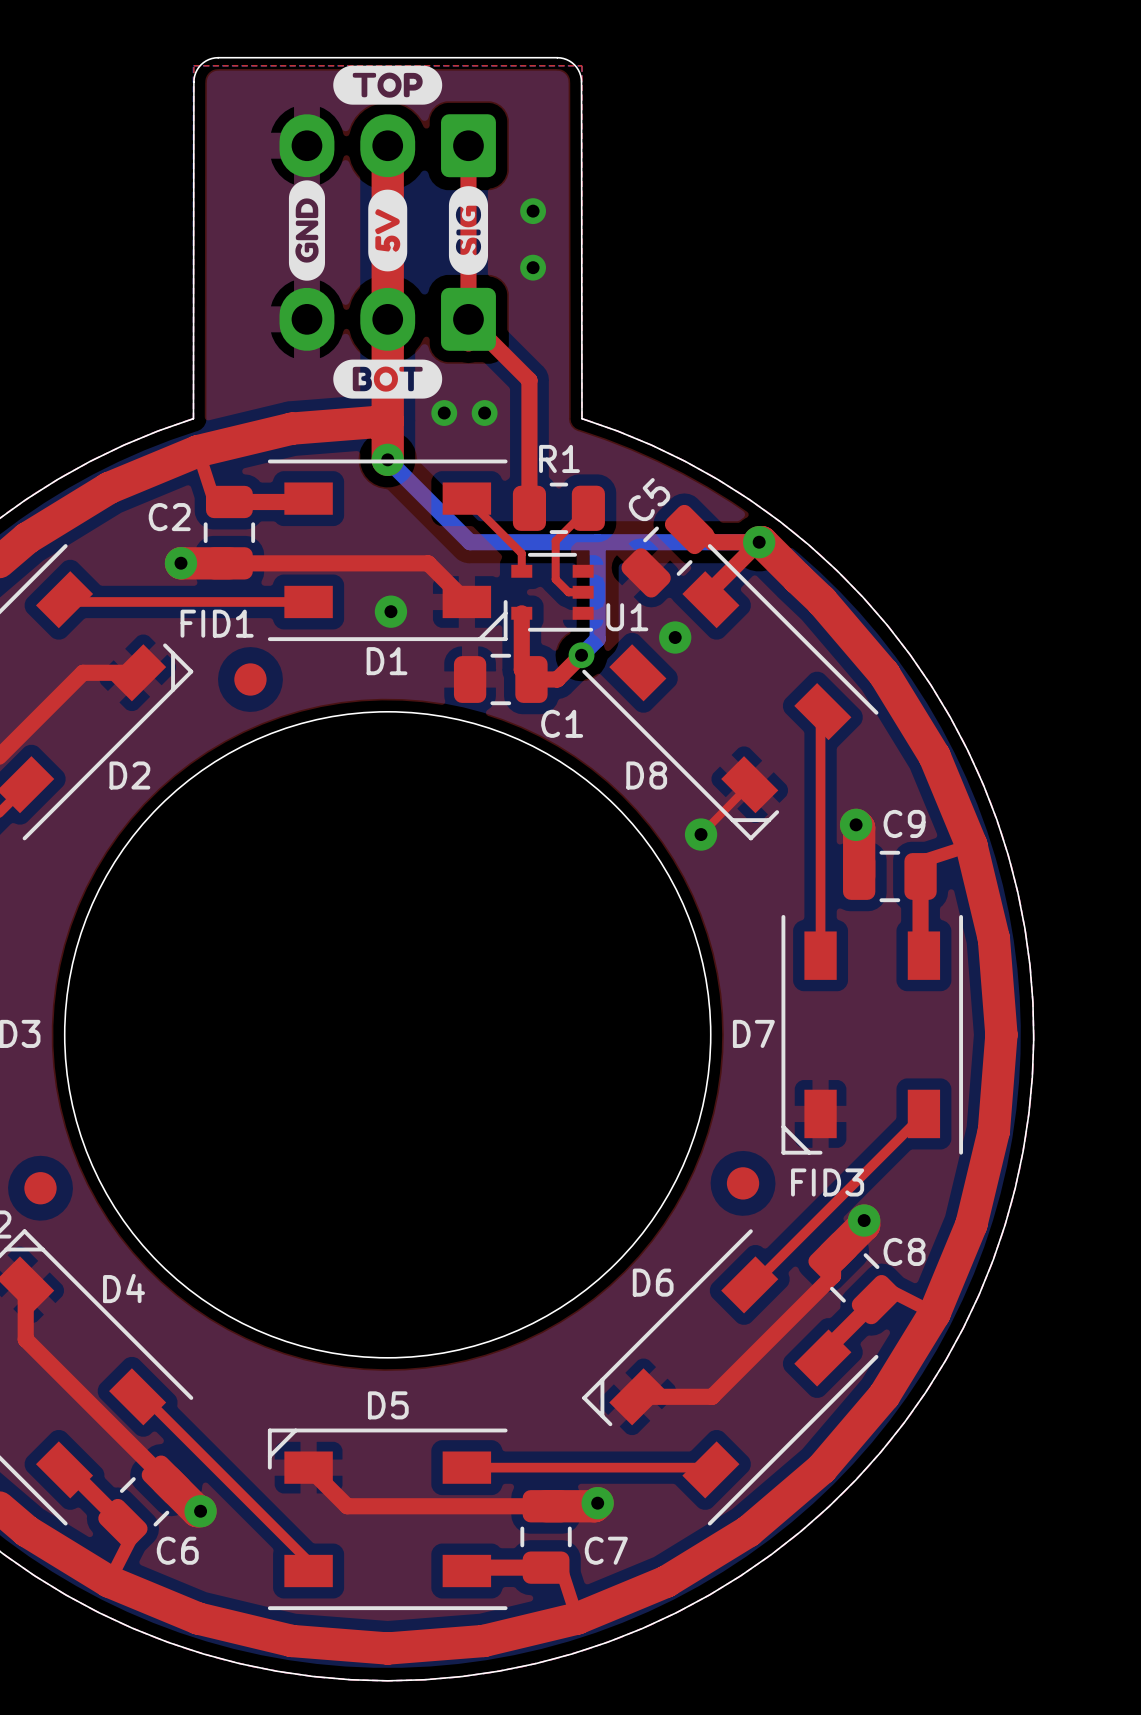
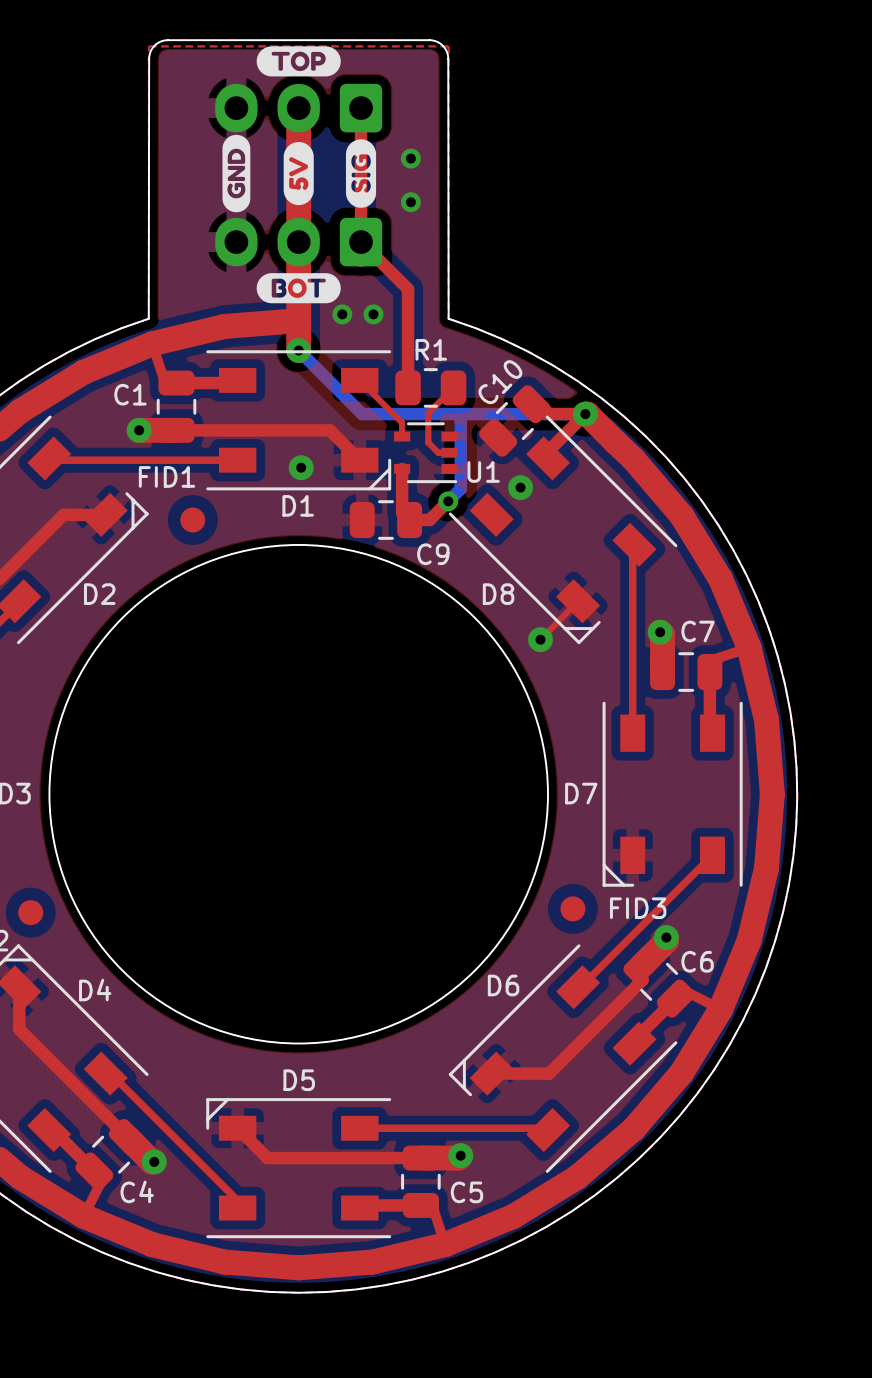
C5 name: C5 (649, 499) -> C10 (500, 382)
C2 name: C2 (169, 517) -> C1 (130, 394)
C1 name: C1 (562, 723) -> C9 (433, 554)
C9 name: C9 (904, 823) -> C7 (697, 631)
C8 name: C8 (904, 1251) -> C6 (697, 961)
C6 name: C6 (177, 1550) -> C4 (137, 1191)
C7 name: C7 (606, 1550) -> C5 (466, 1192)

